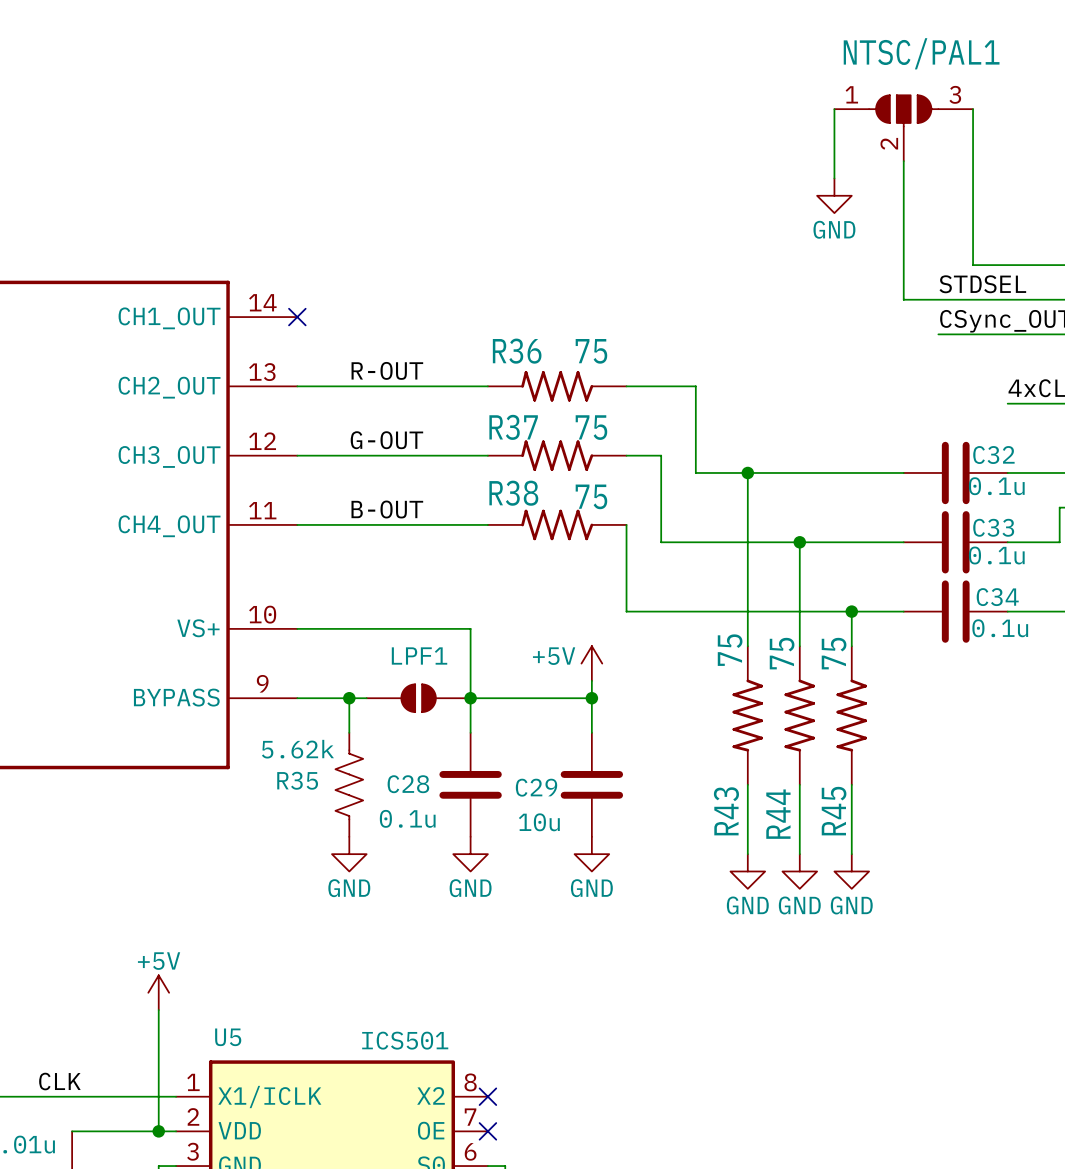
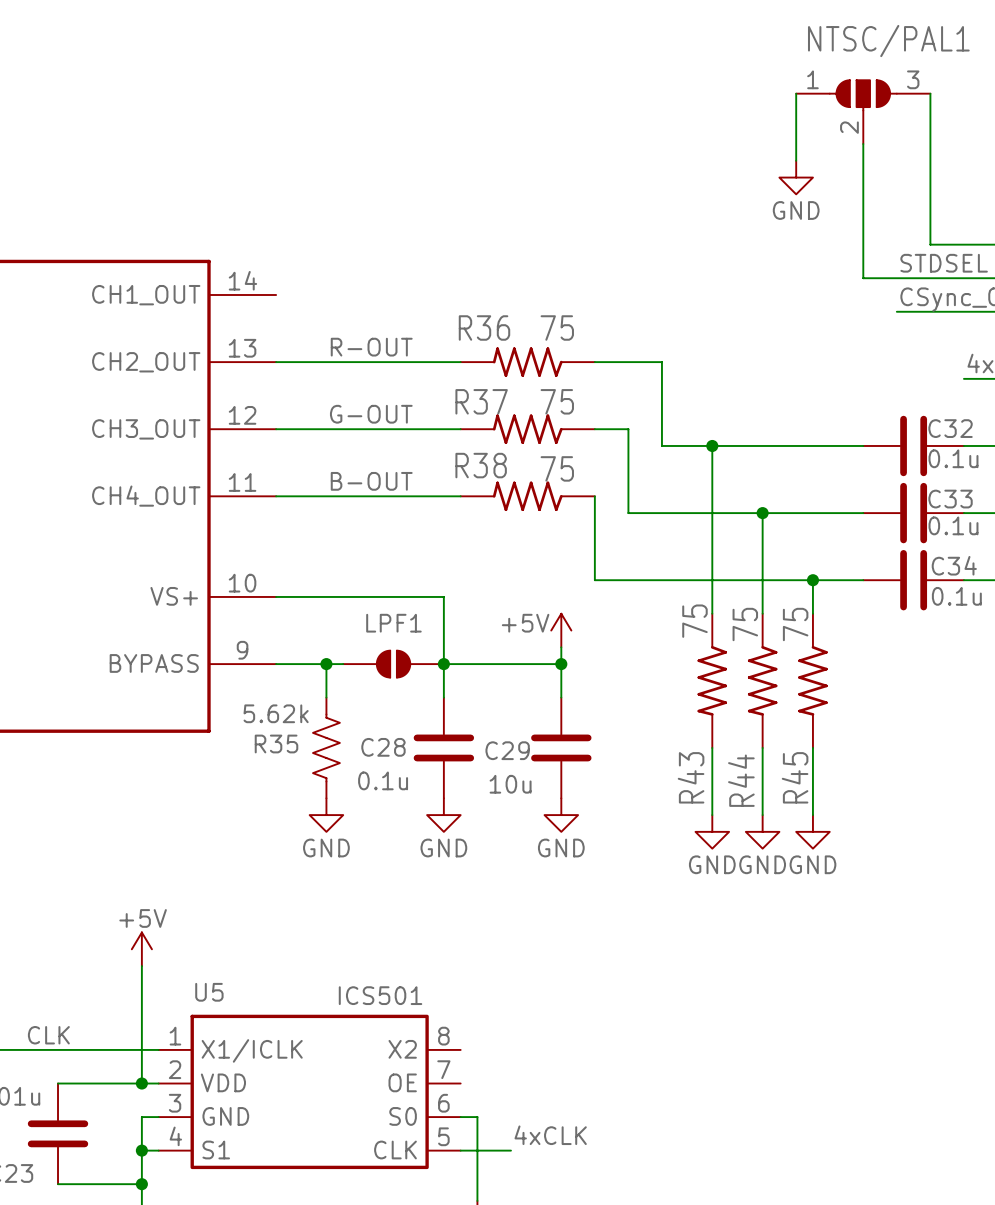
no-connect mark: (297, 317) -> none
no-connect mark: (487, 1096) -> none
no-connect mark: (487, 1131) -> none

